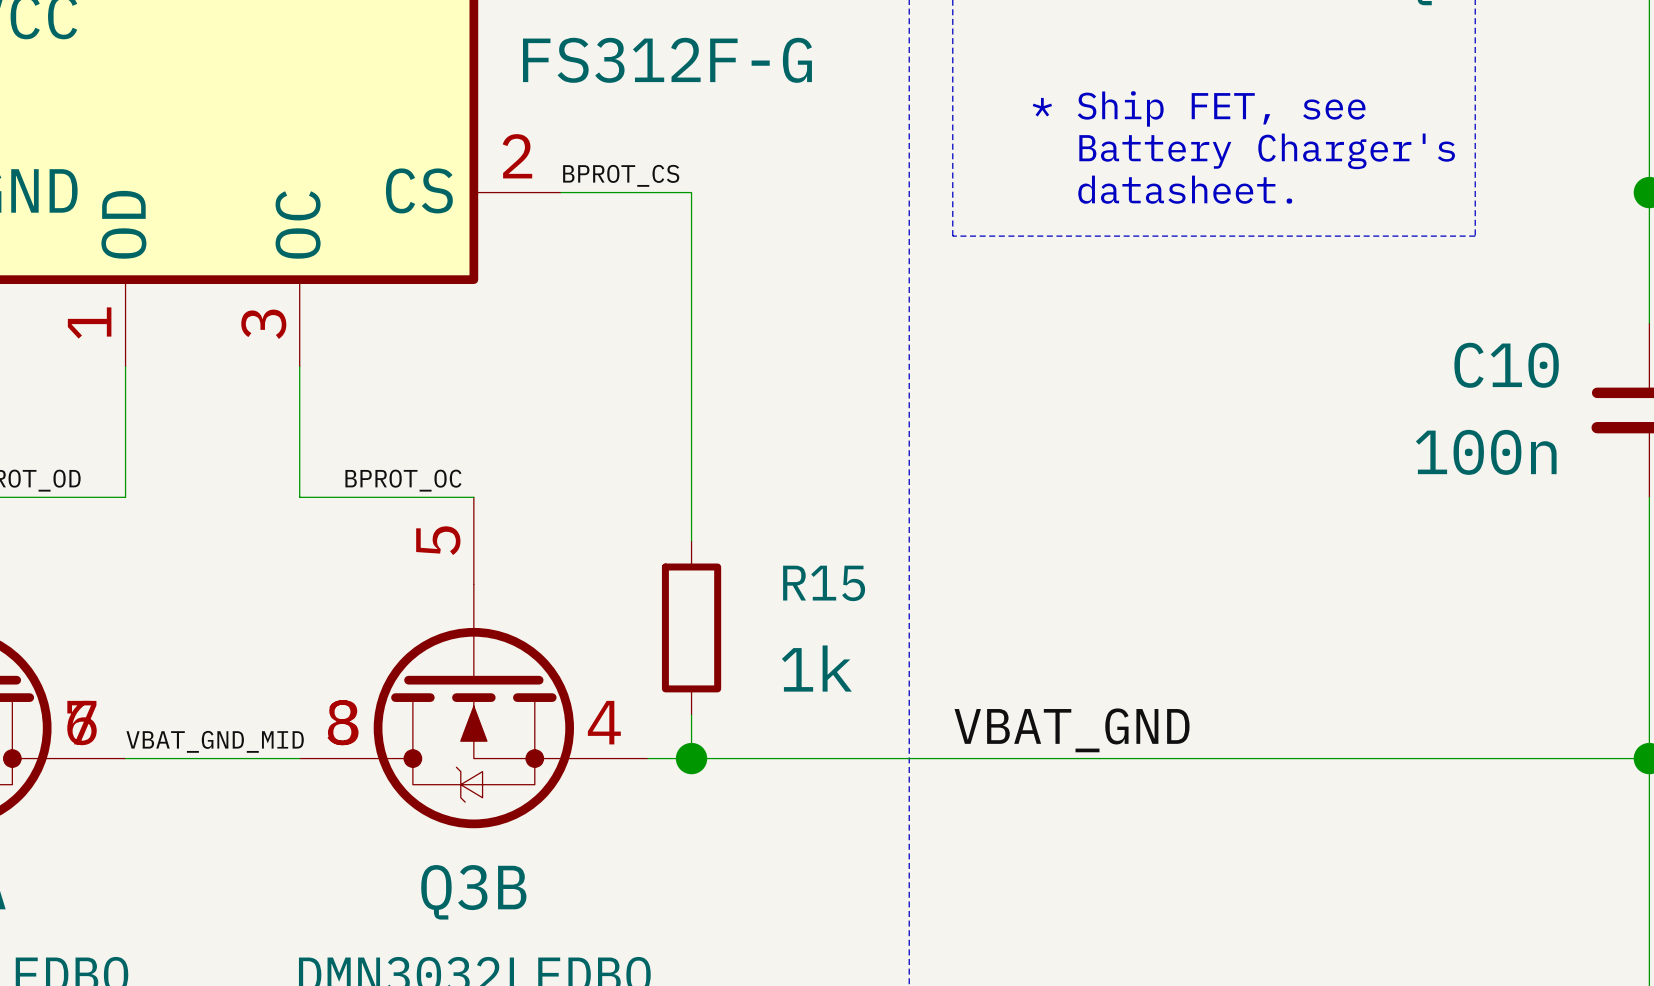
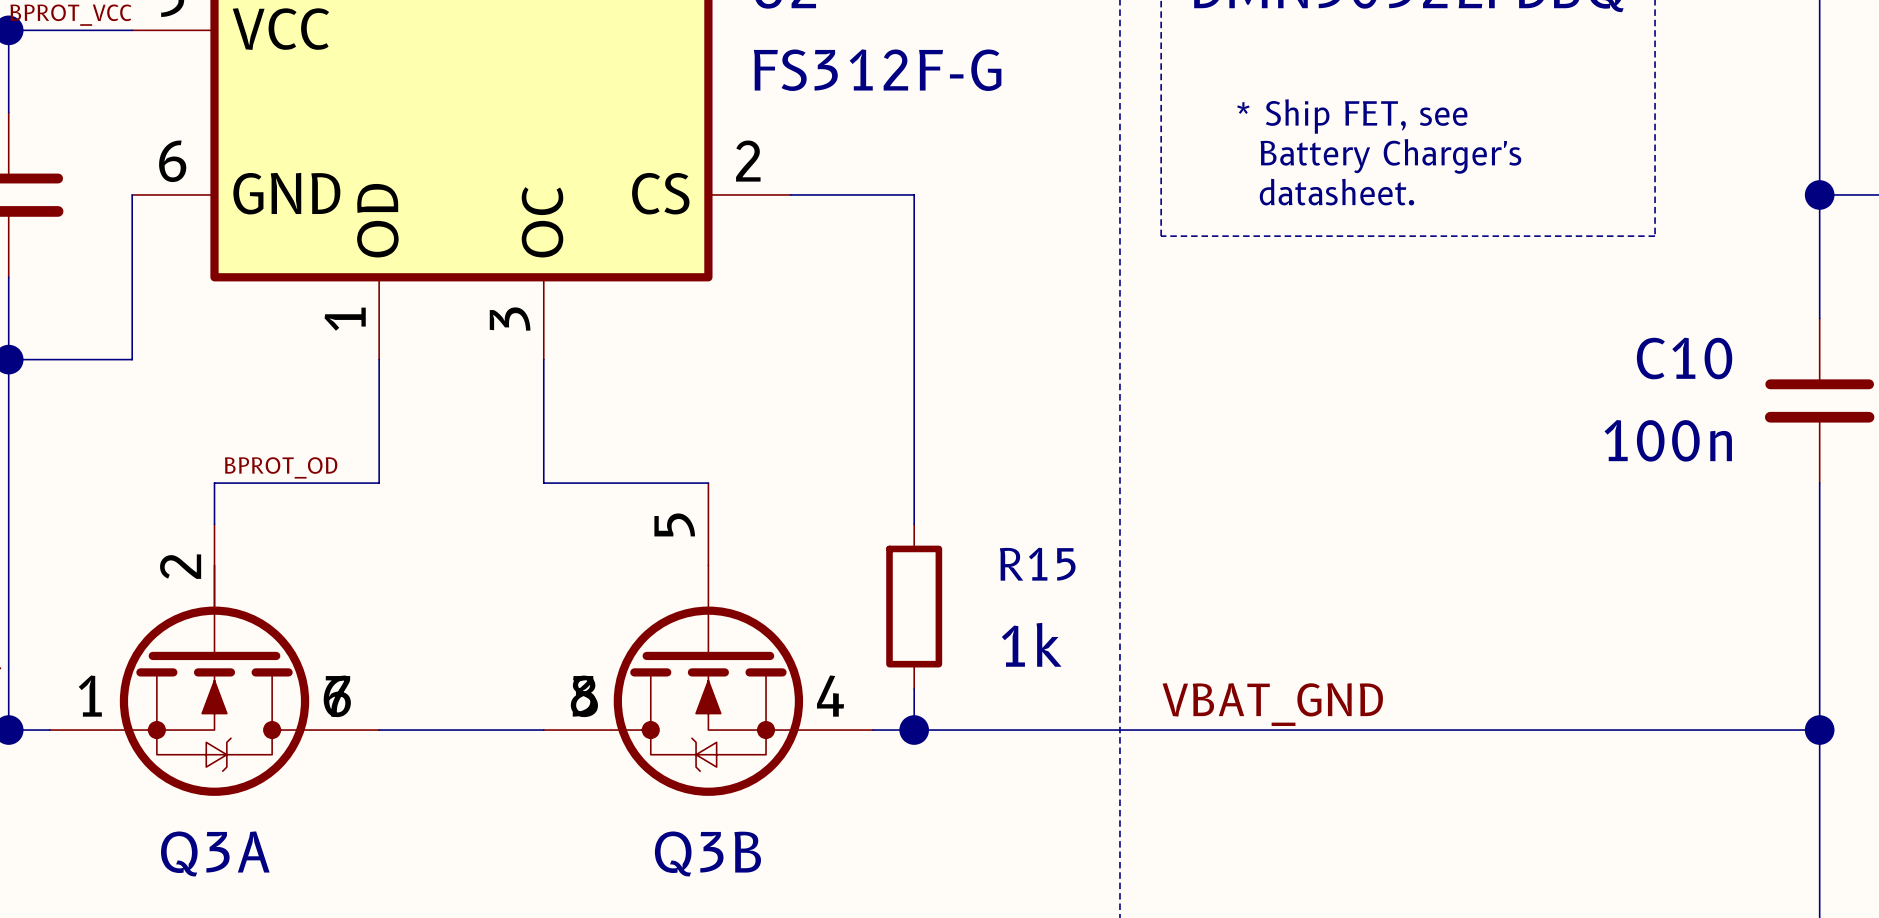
label: BPROT_CS (621, 175) -> none
label: BPROT_OC (403, 480) -> none
label: VBAT_GND_MID (215, 741) -> none

